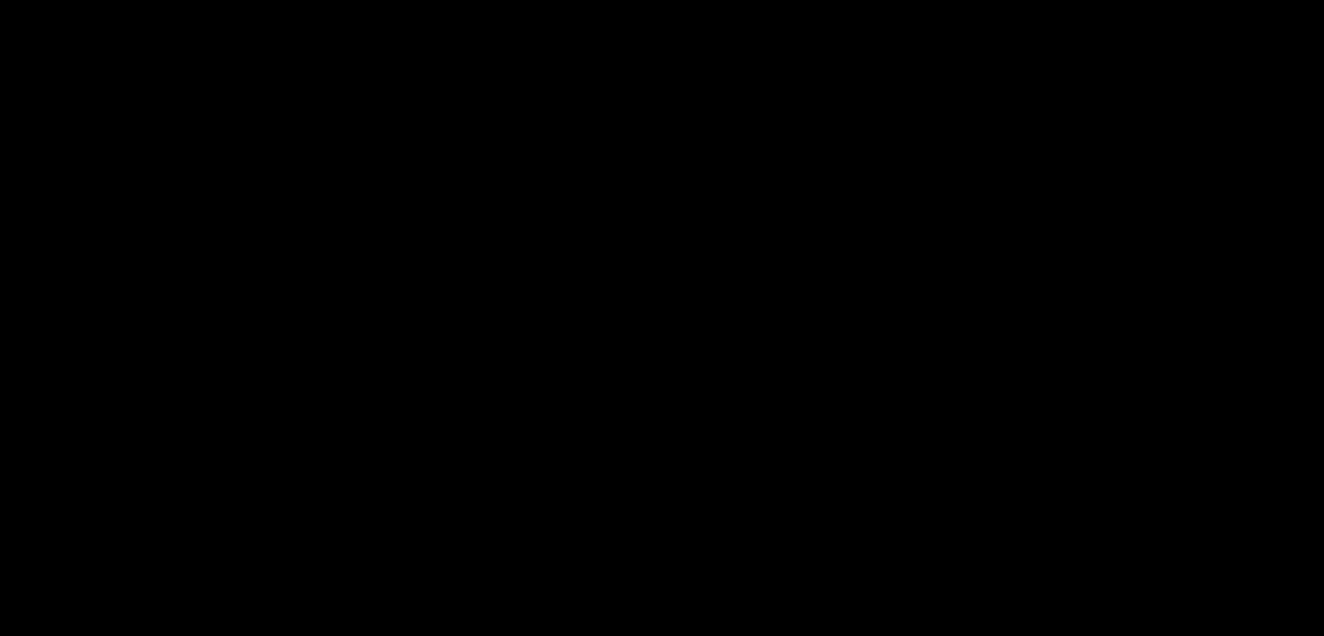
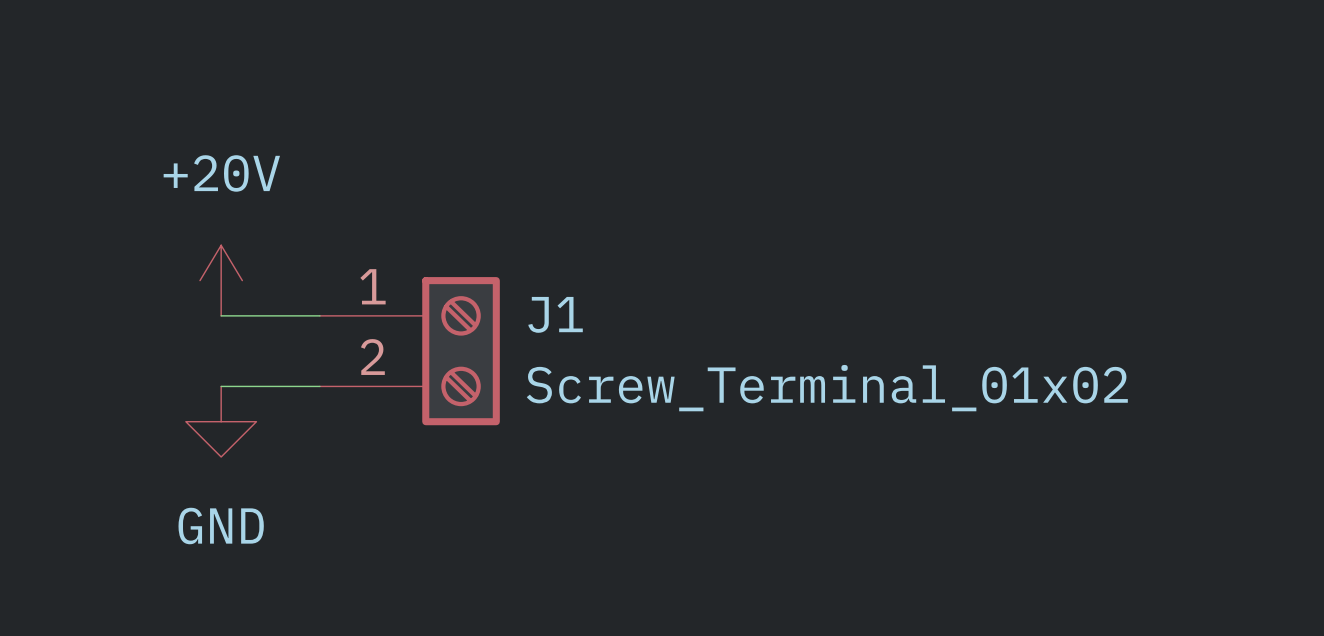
power symbol: none -> +20V (221, 280)
wire: none -> (221, 315) (319, 315)
J1: none -> Screw_Terminal_01x02 (409, 351)
wire: none -> (221, 386) (319, 386)
power symbol: none -> GND (221, 421)

